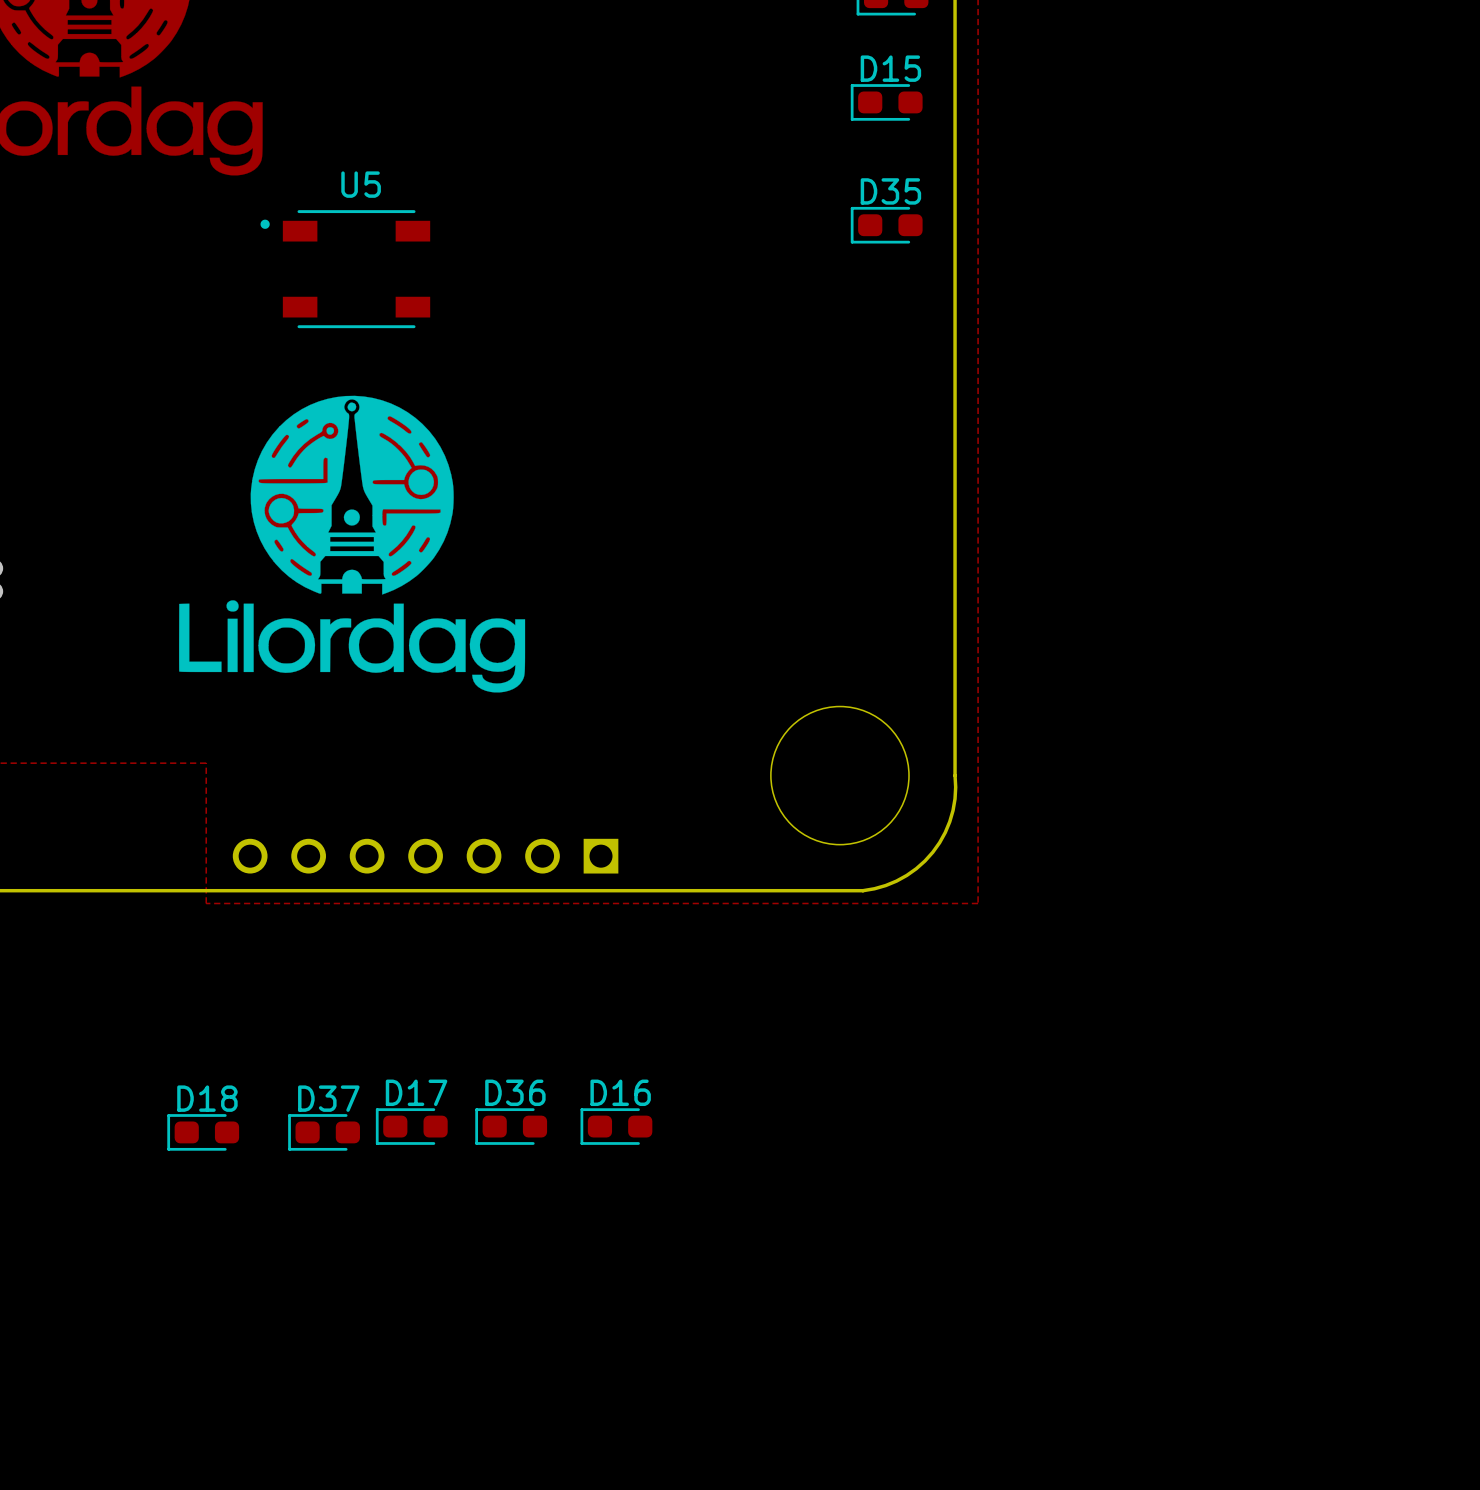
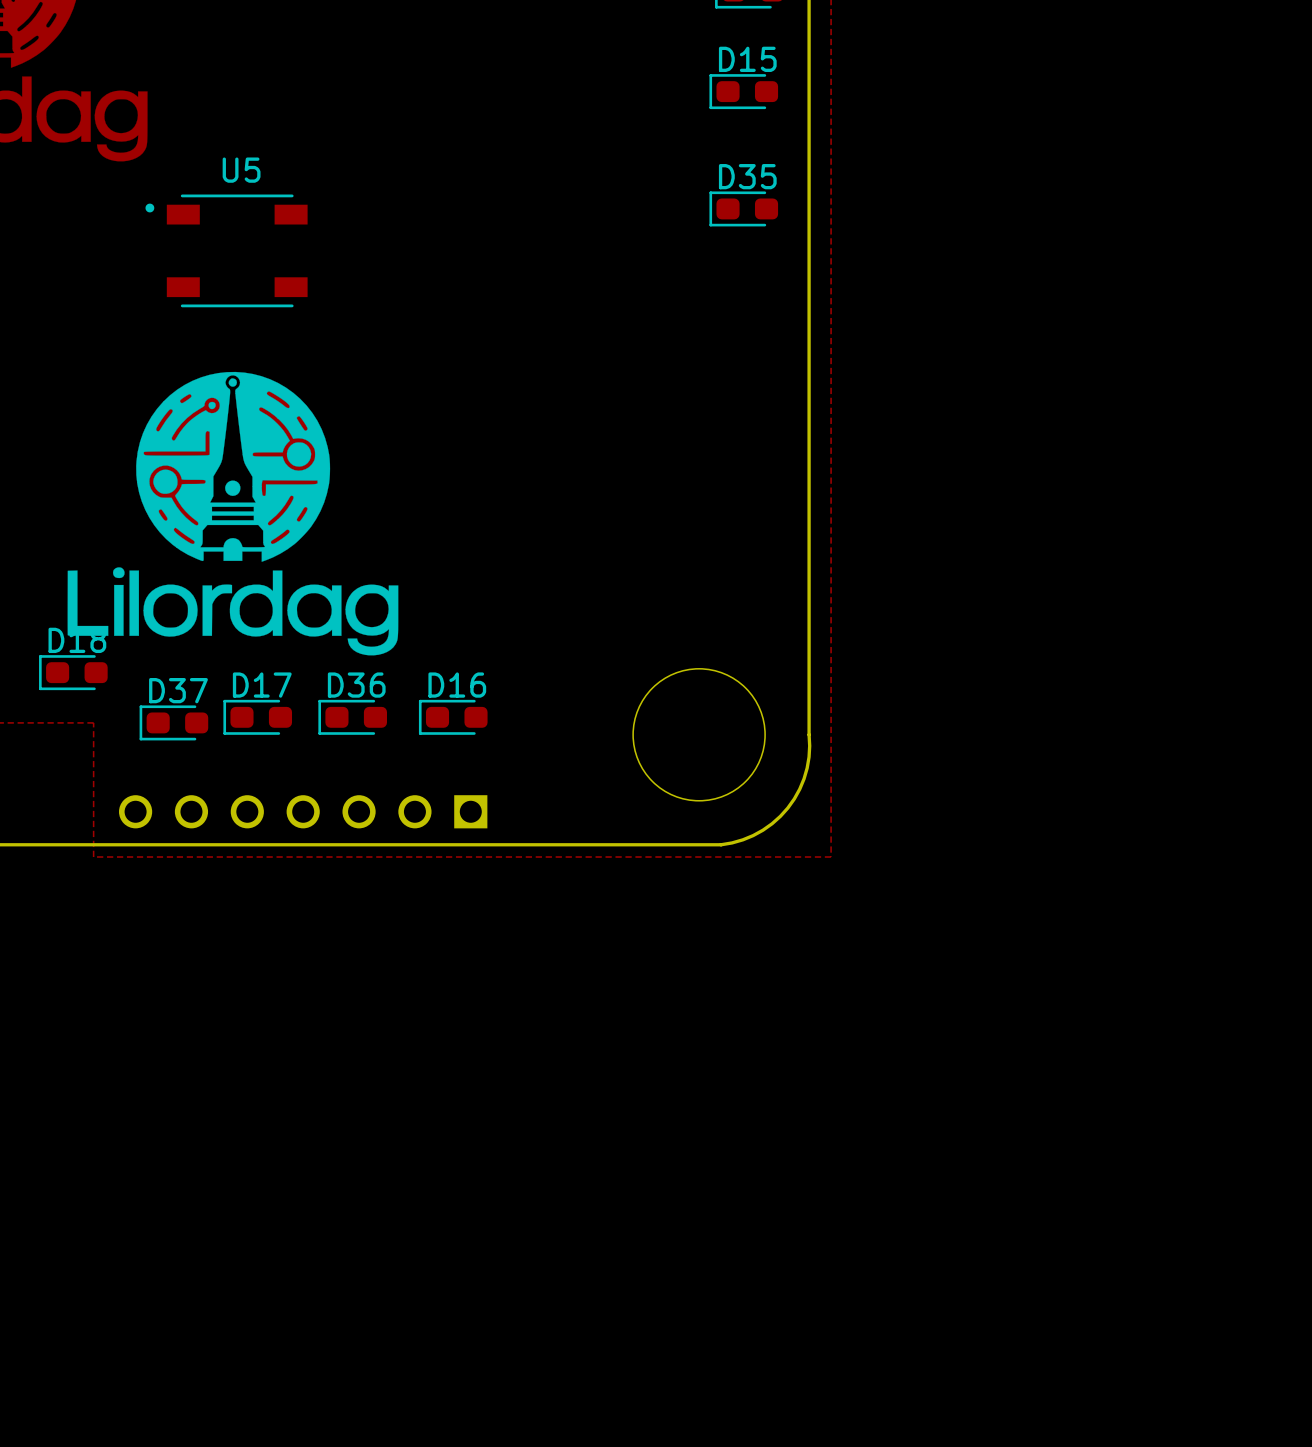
D17 position: (411, 1126) -> (257, 717)
D36 position: (511, 1126) -> (352, 717)
D16 position: (616, 1126) -> (453, 717)
D18 position: (203, 1132) -> (73, 672)
D37 position: (324, 1132) -> (173, 722)

